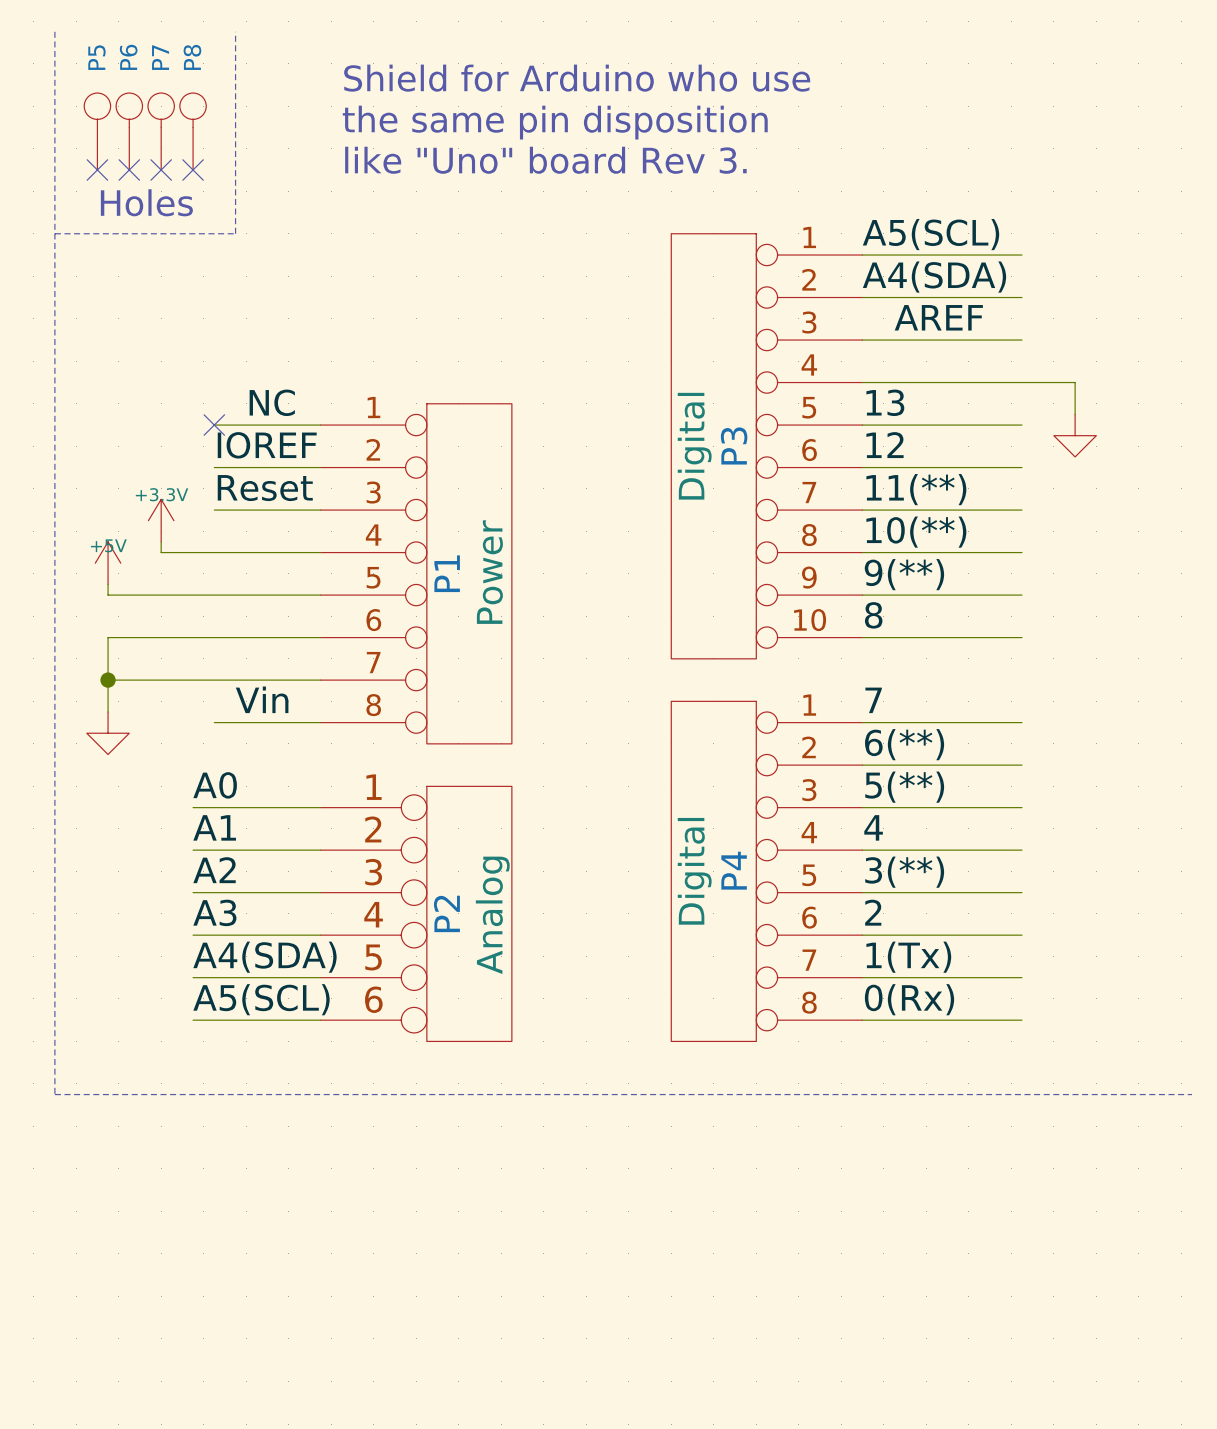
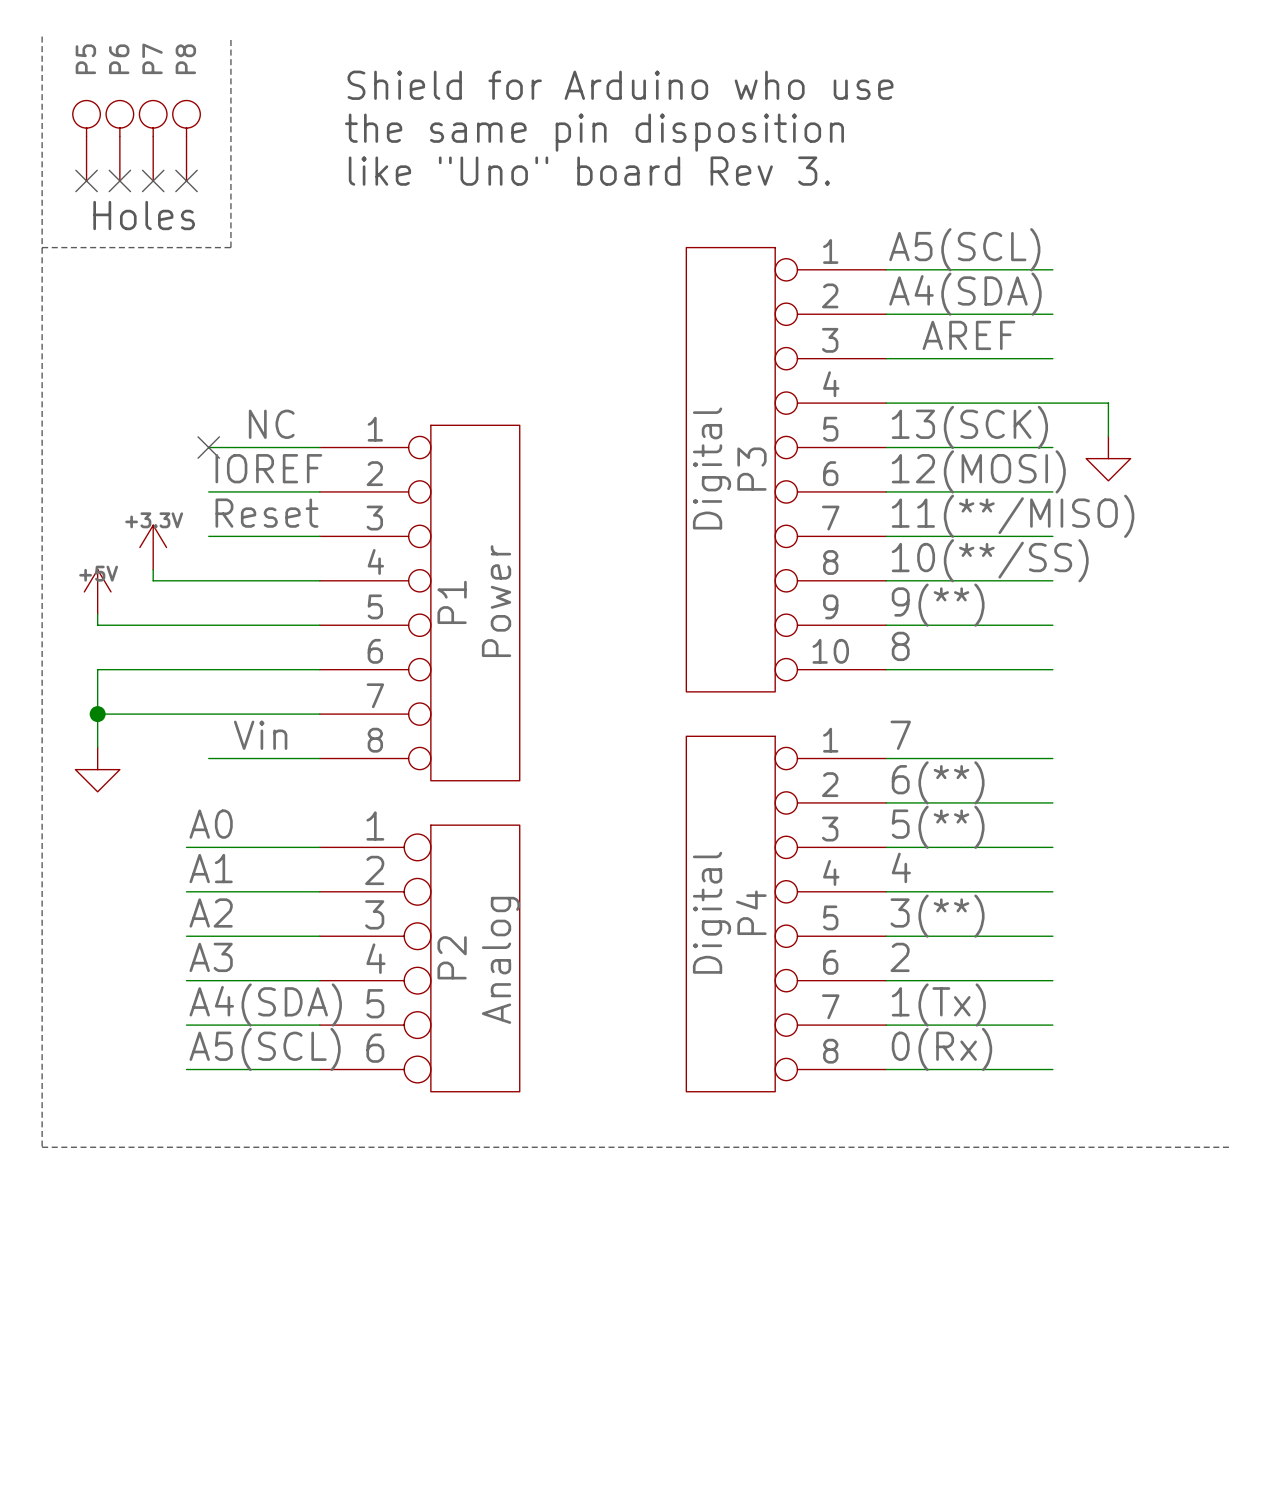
label: 13 (885, 402) -> 13(SCK) (969, 427)
label: 12 (885, 445) -> 12(MOSI) (978, 471)
label: 11(**) (916, 489) -> 11(**/MISO) (1013, 516)
label: 10(**) (916, 532) -> 10(**/SS) (990, 560)

